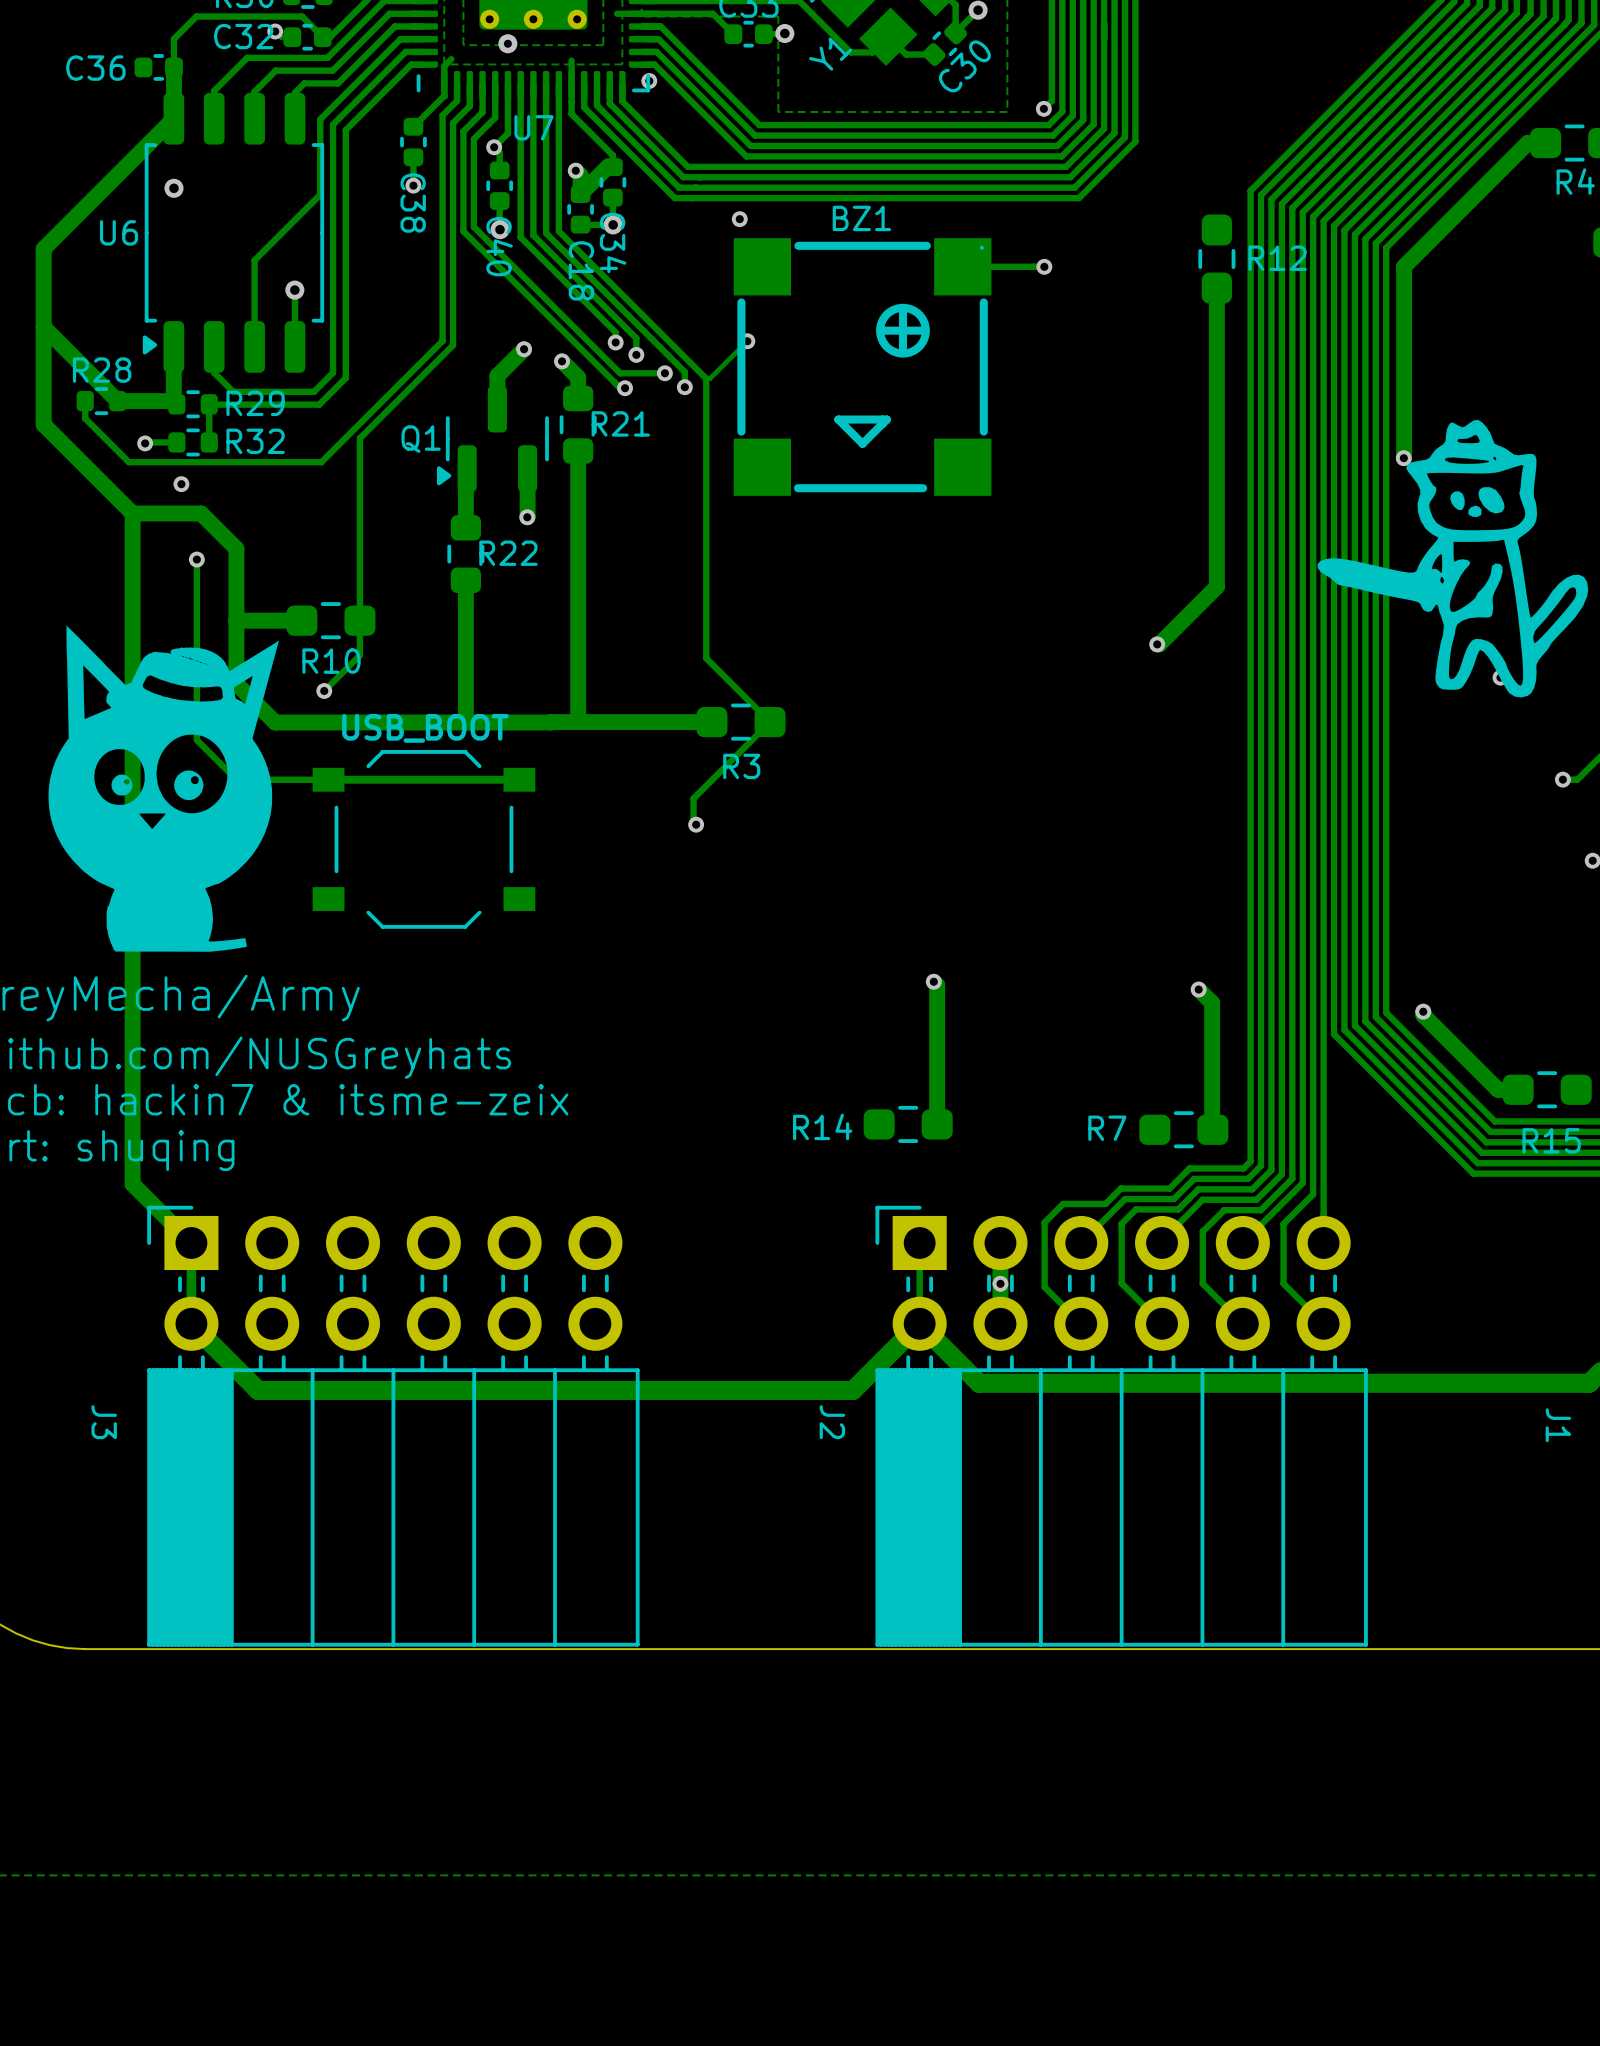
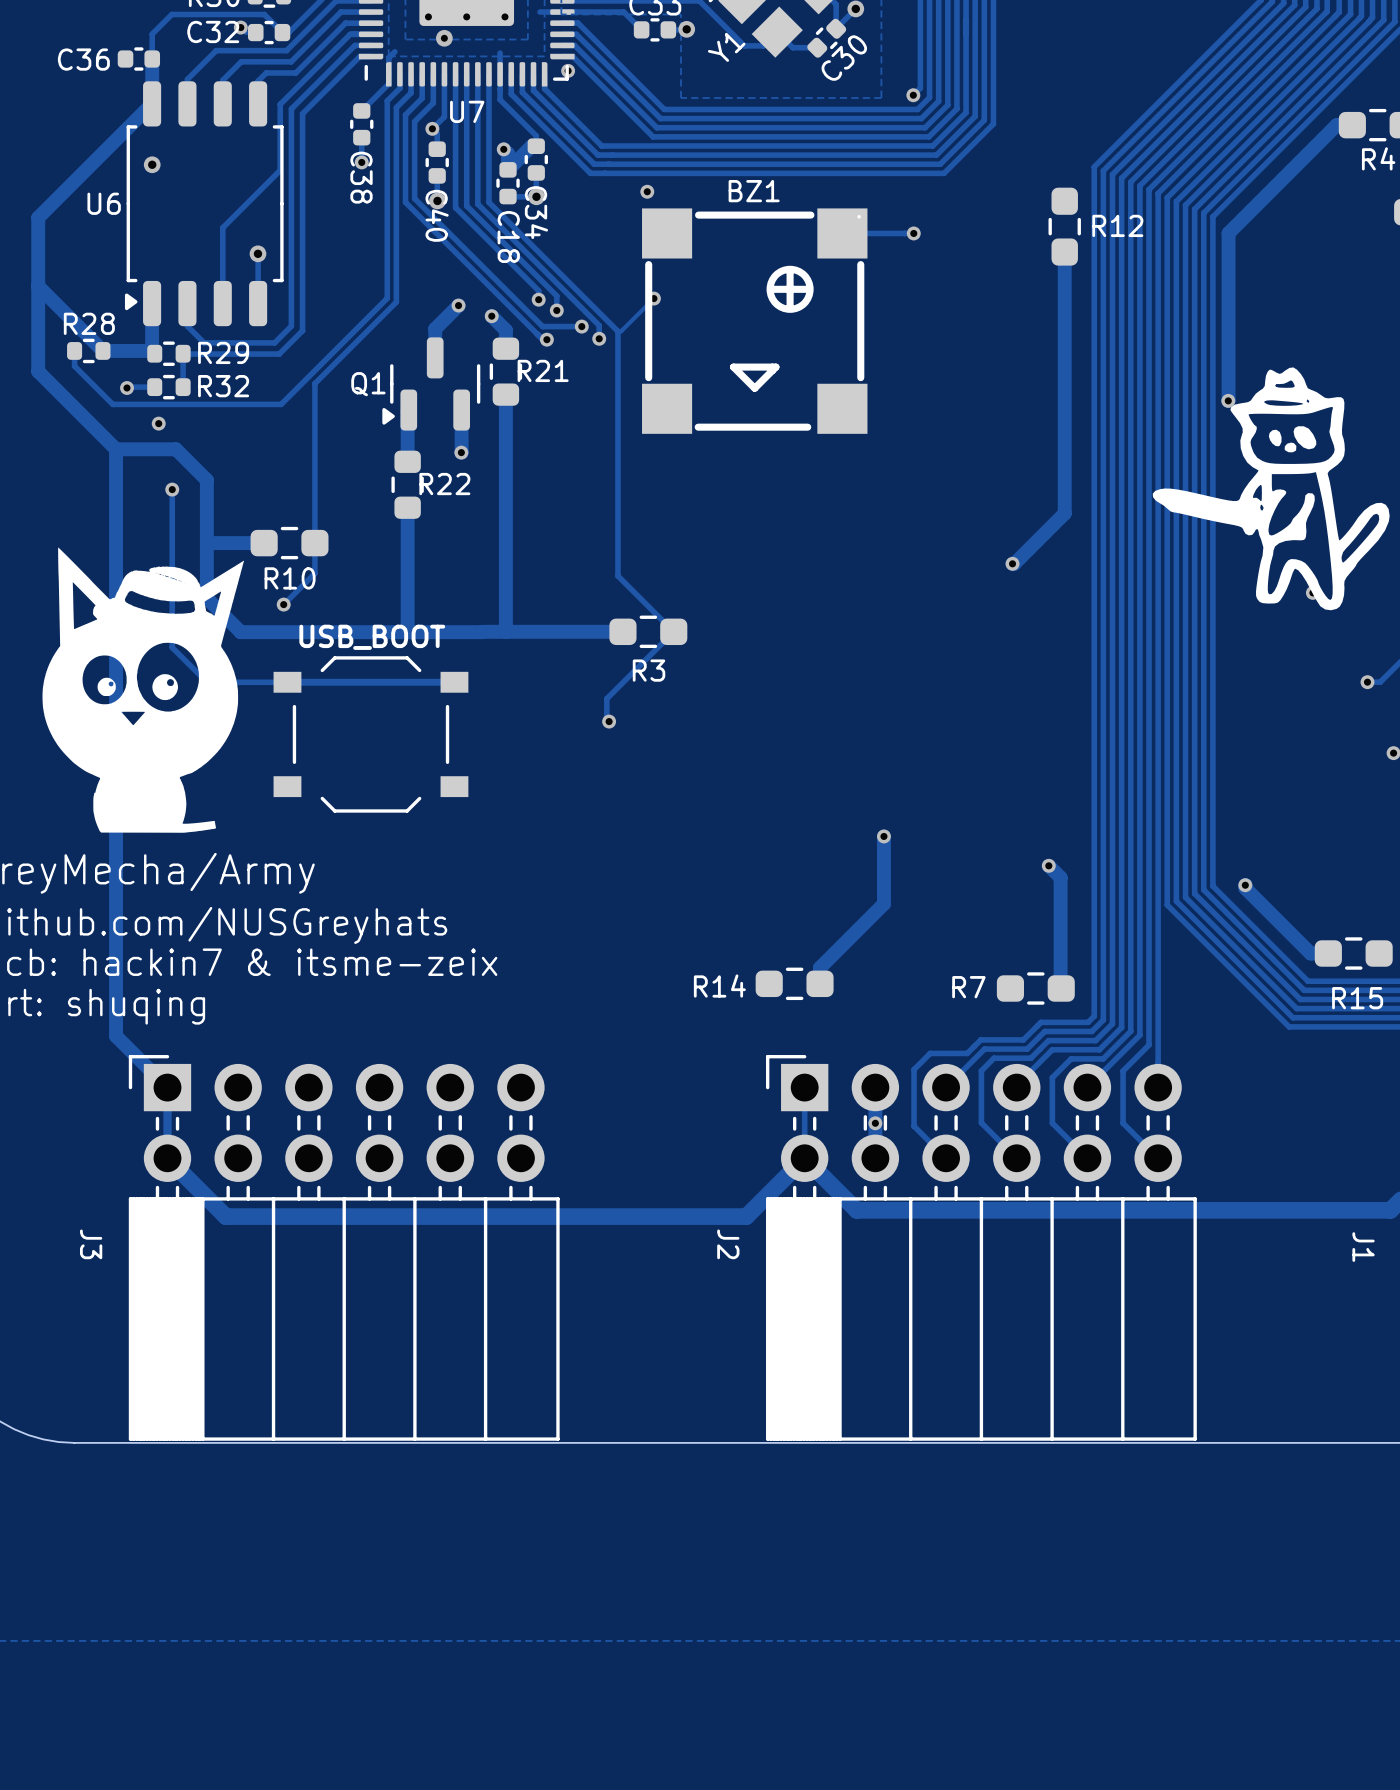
track: (933, 981) (937, 985) (937, 1106) -> (883, 836) (883, 903) (819, 967)
via position: (933, 981) -> (883, 836)

